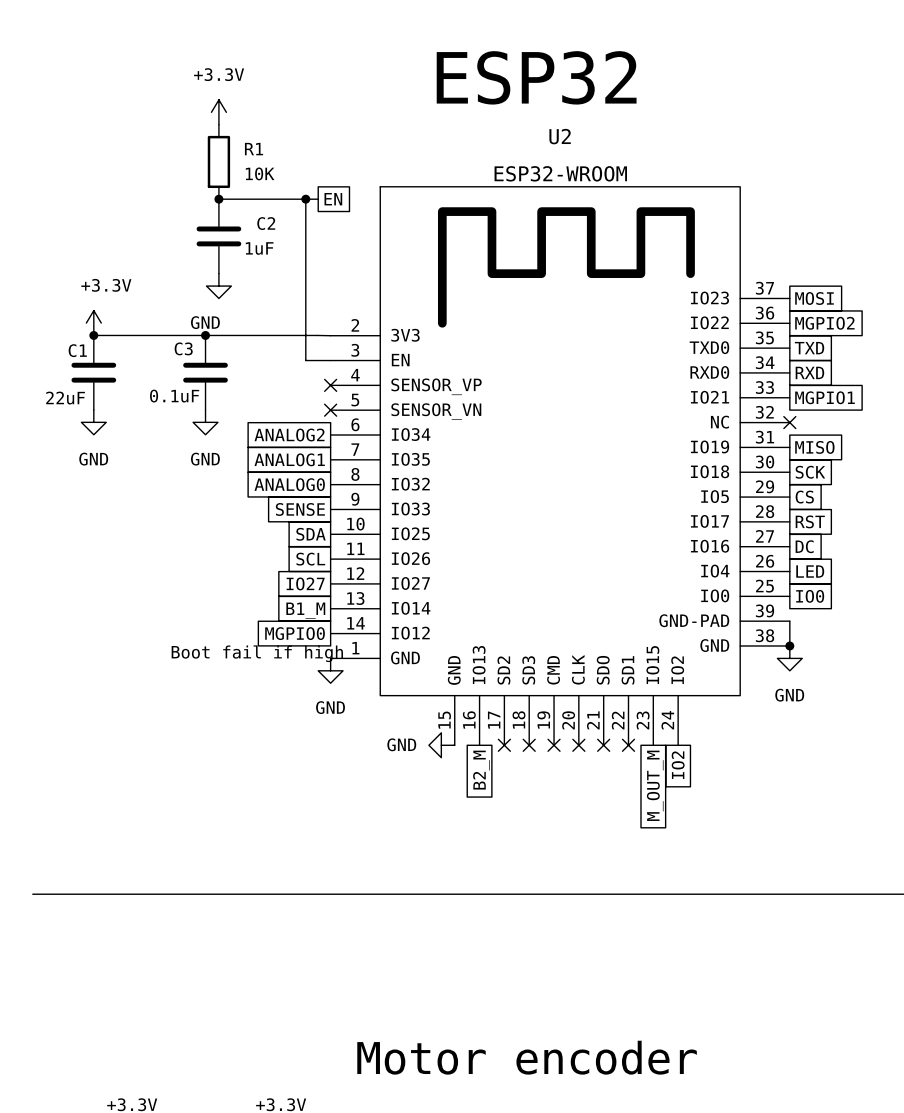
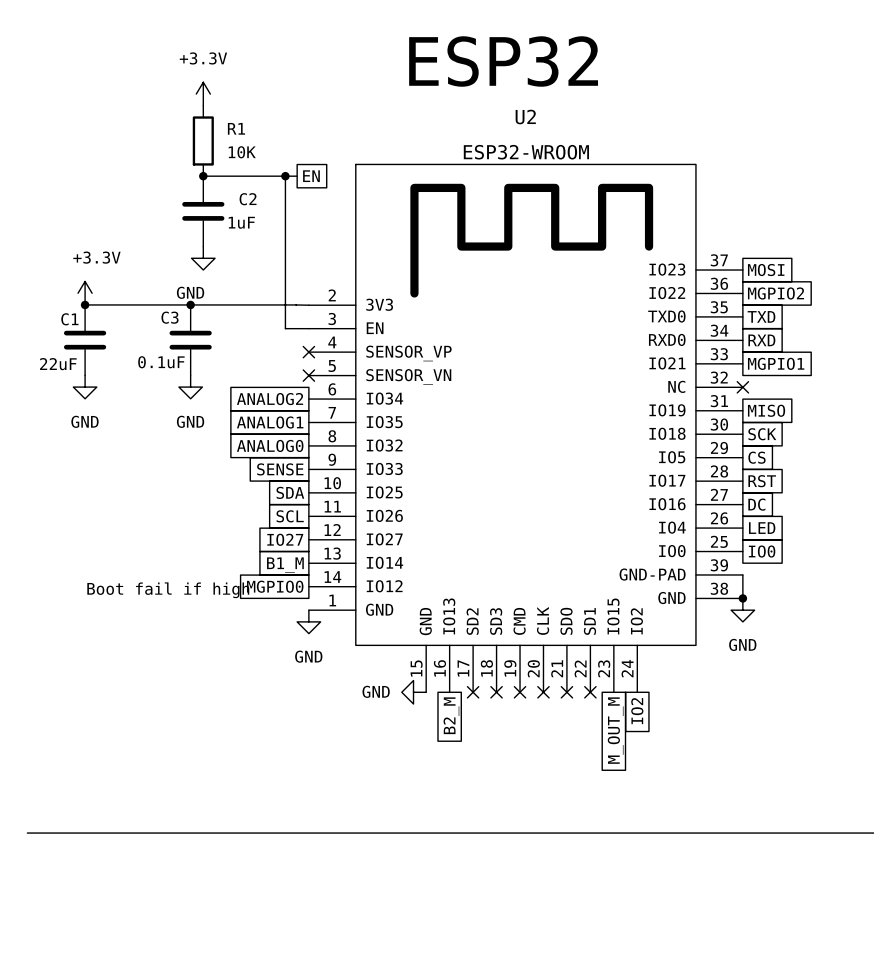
text position: Boot fail if high (257, 653) -> Boot fail if high (168, 590)

